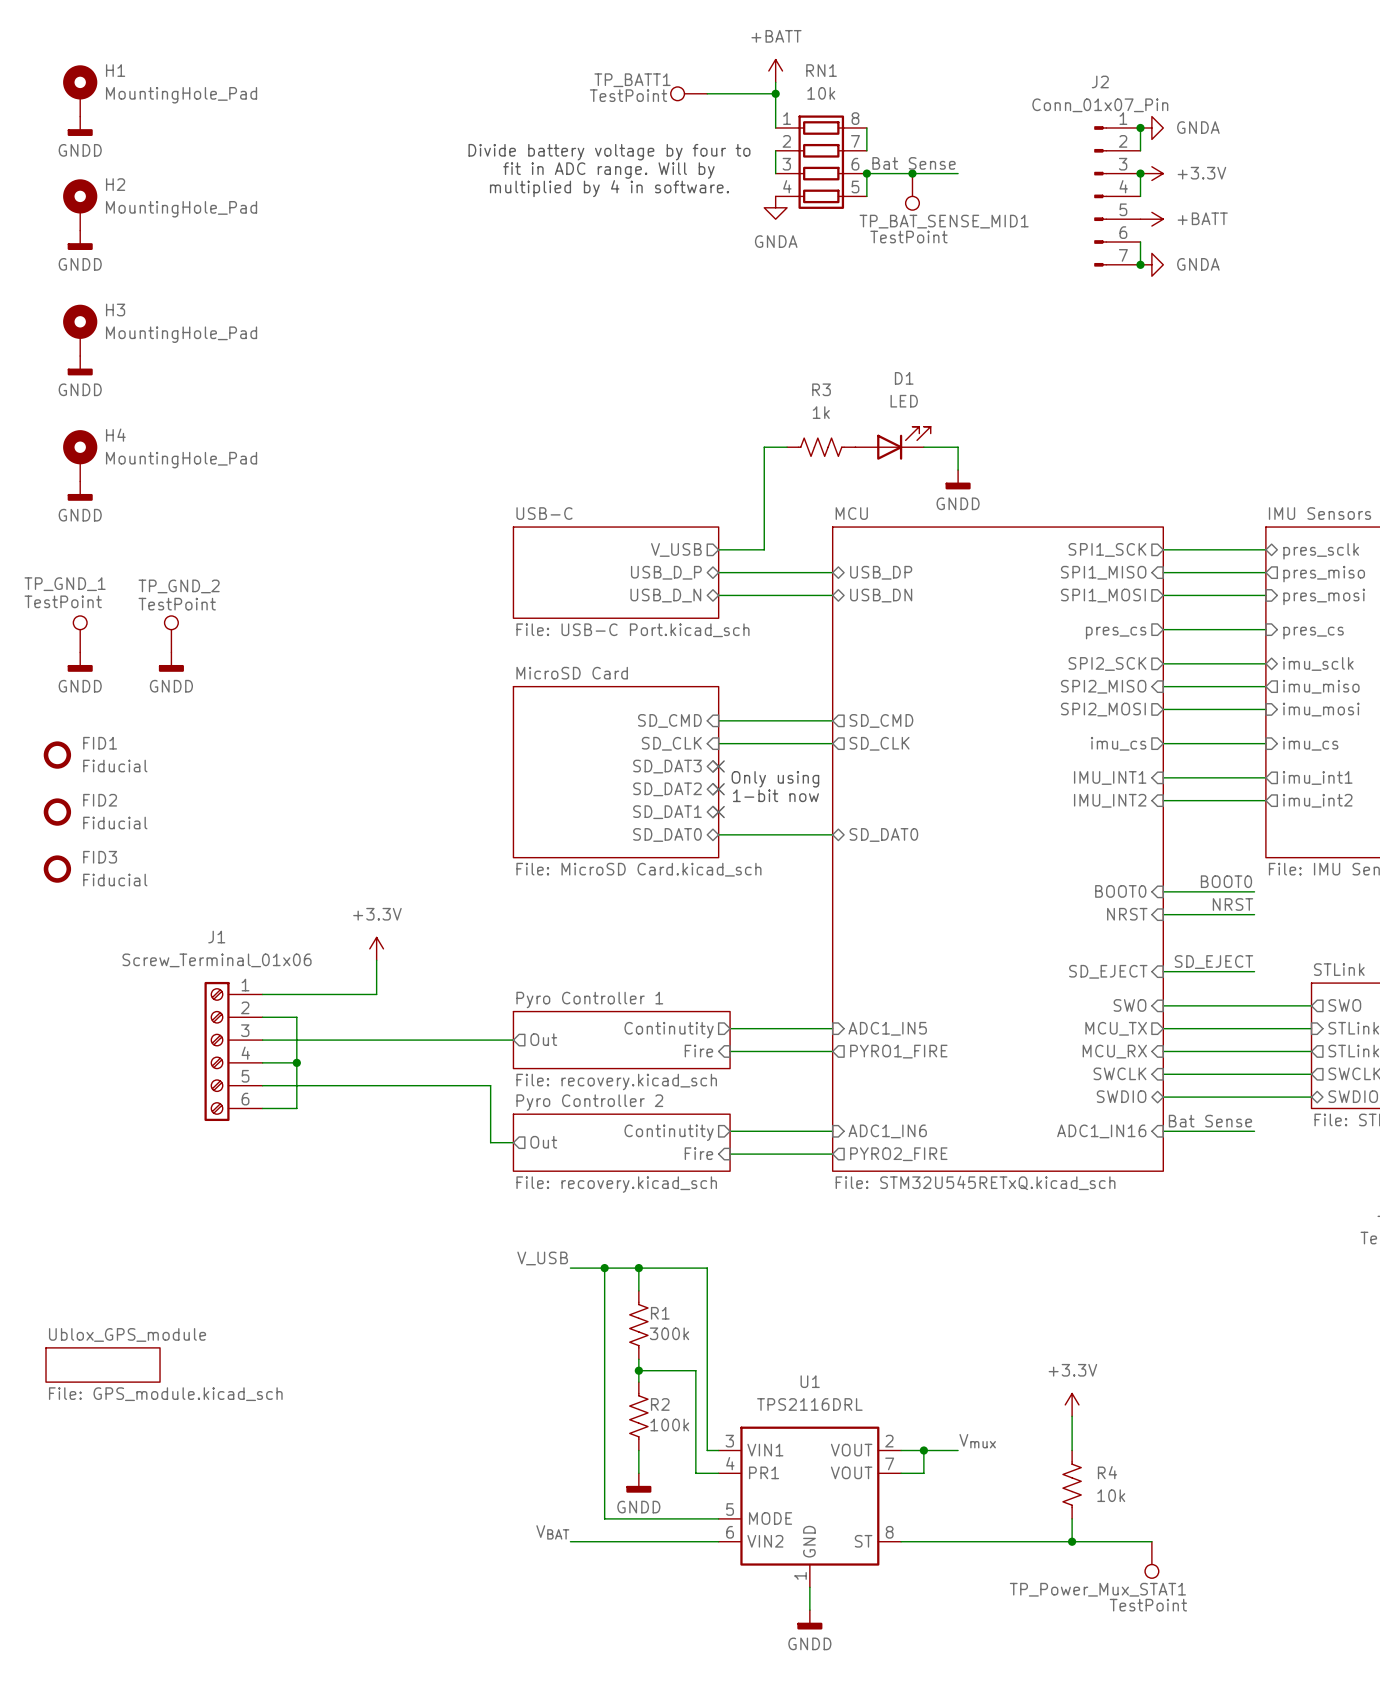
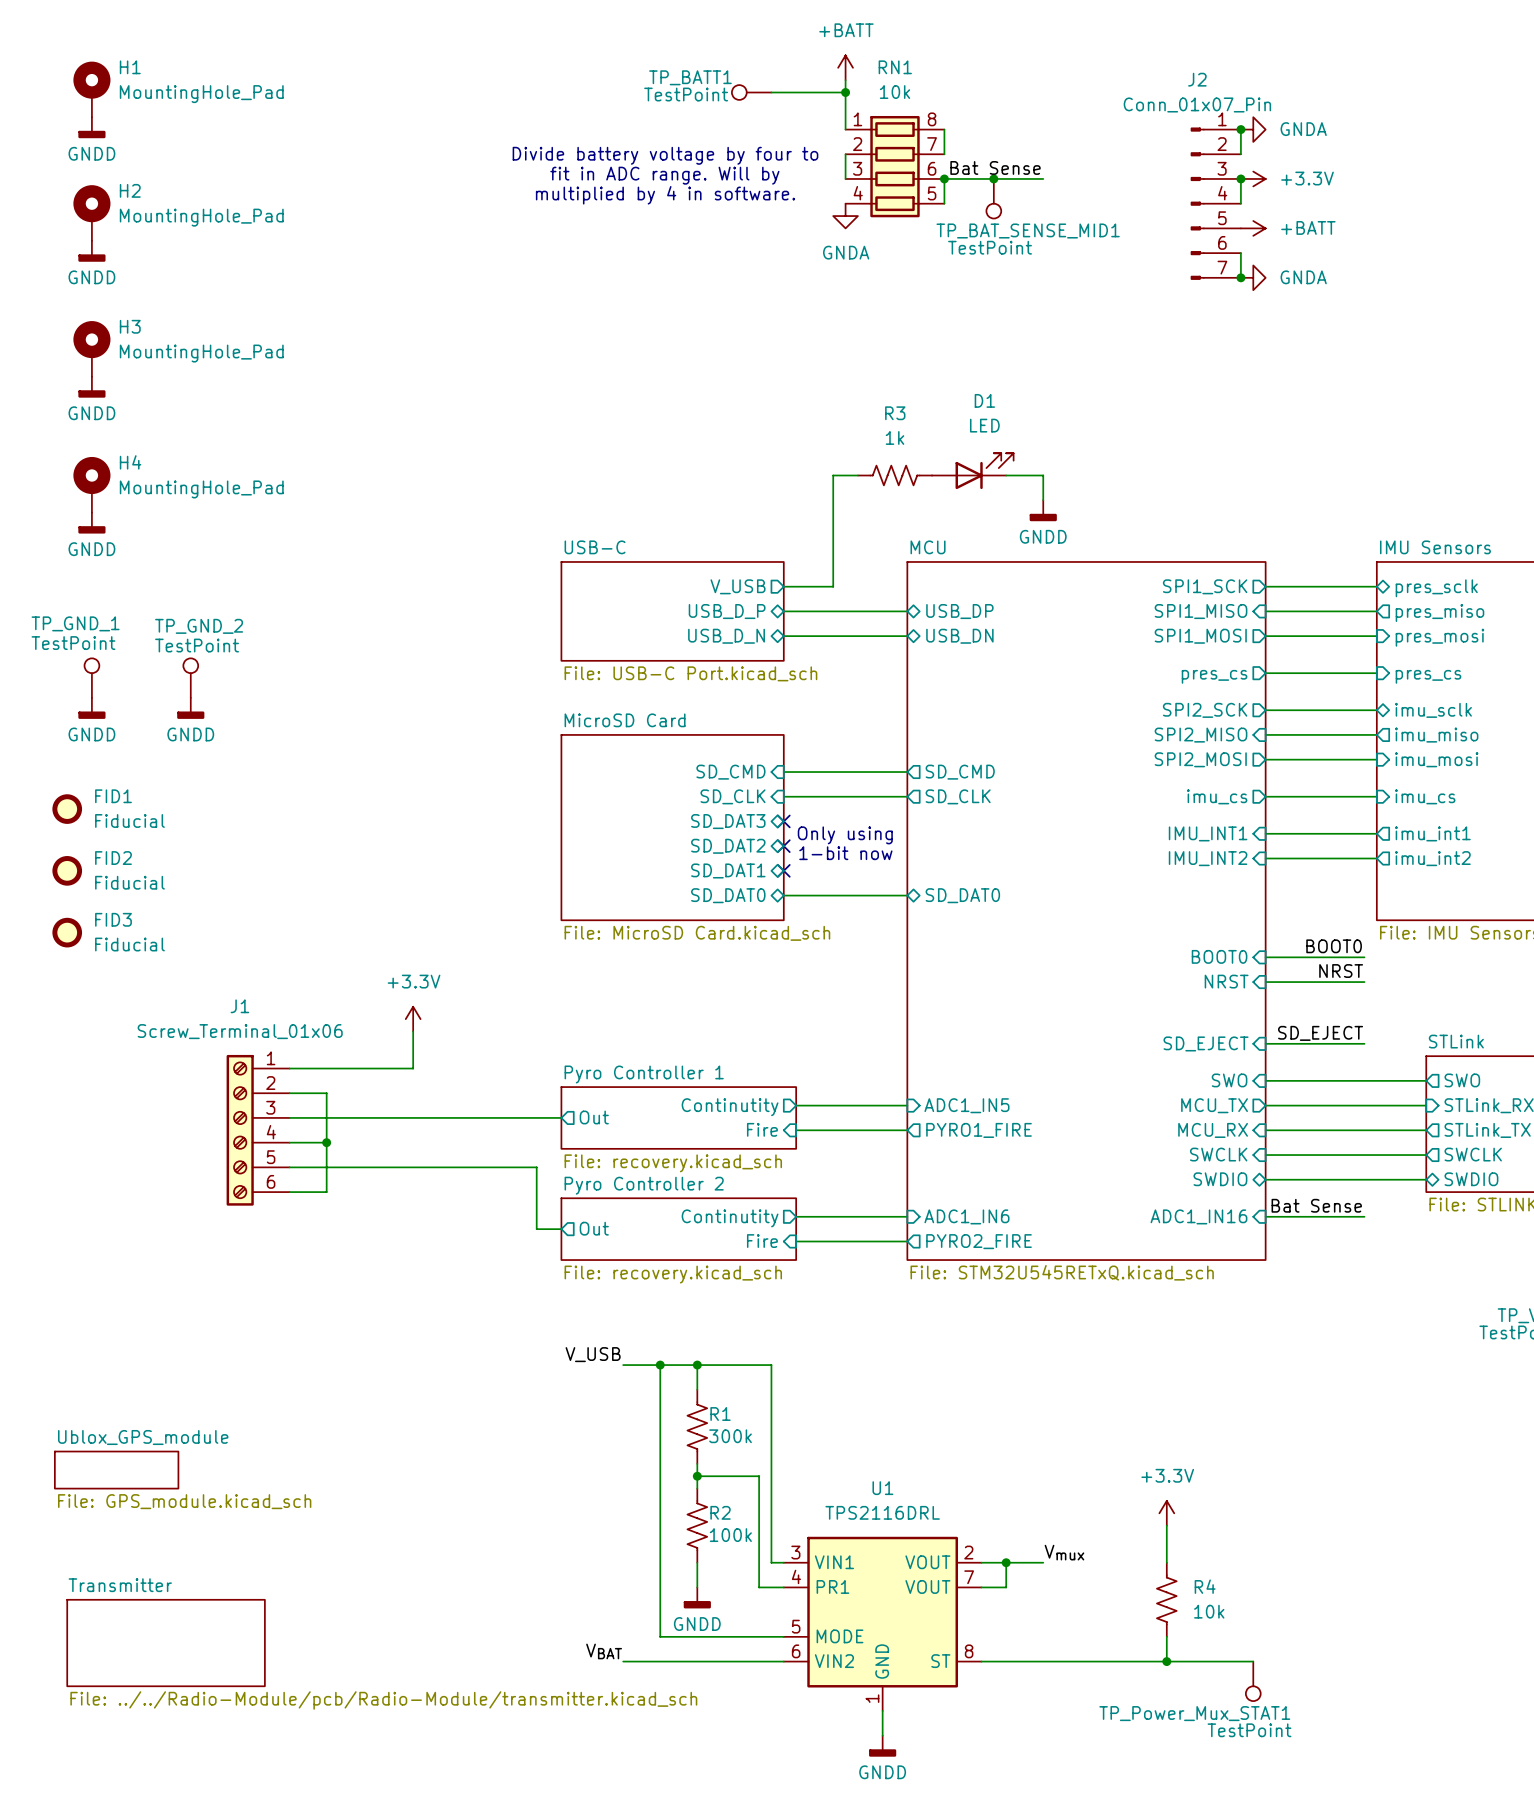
sheet Transmitter: none -> File: ../../Radio-Module/pcb/Radio-Module/transmitter.kicad_sch (166, 1643)

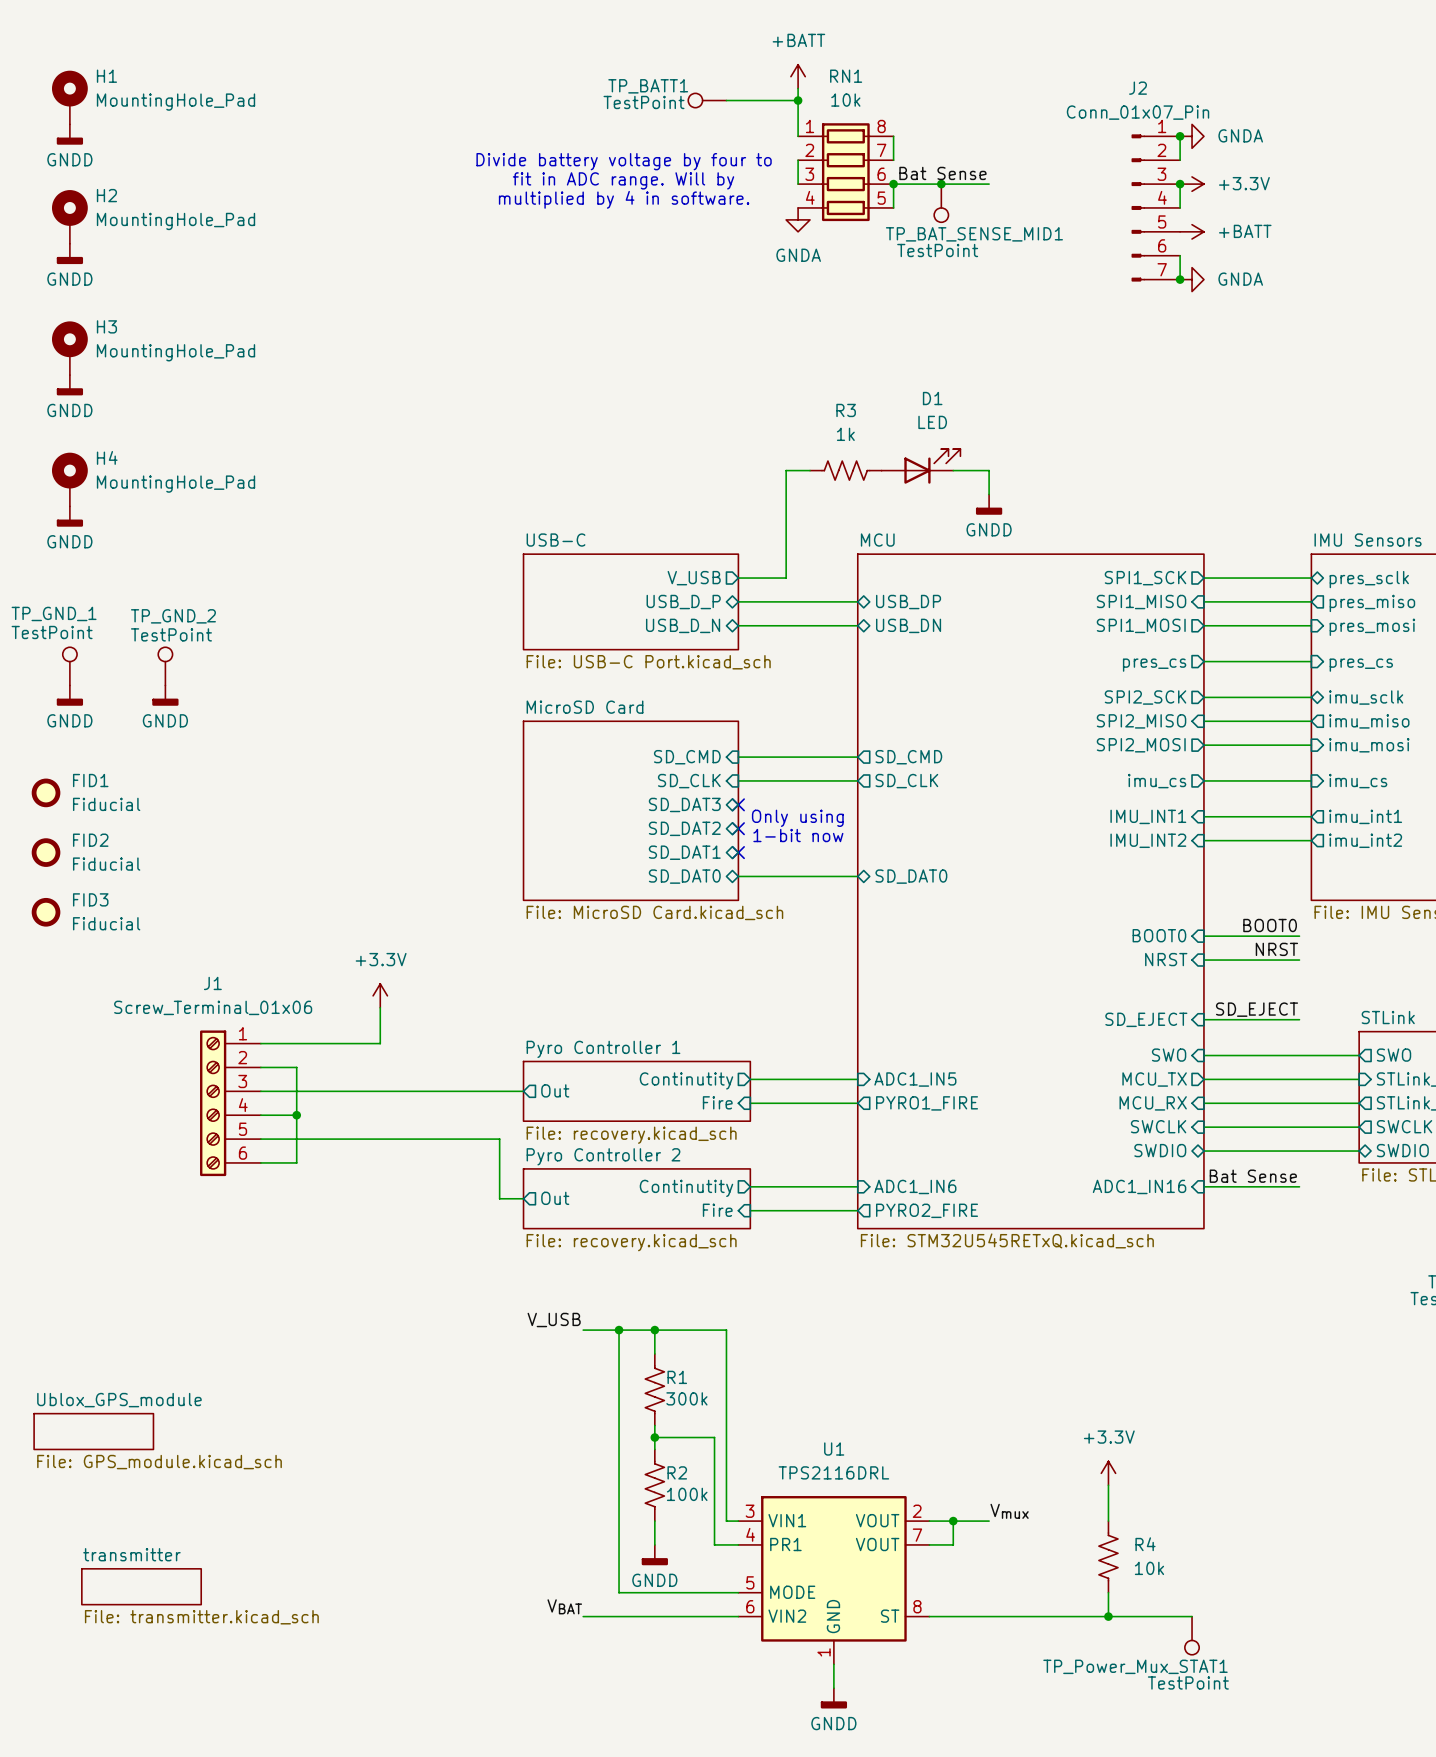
sheet transmitter: none -> File: transmitter.kicad_sch (141, 1586)
sheet Transmitter: File: ../../Radio-Module/pcb/Radio-Module/transmitter.kicad_sch (166, 1643) -> none

